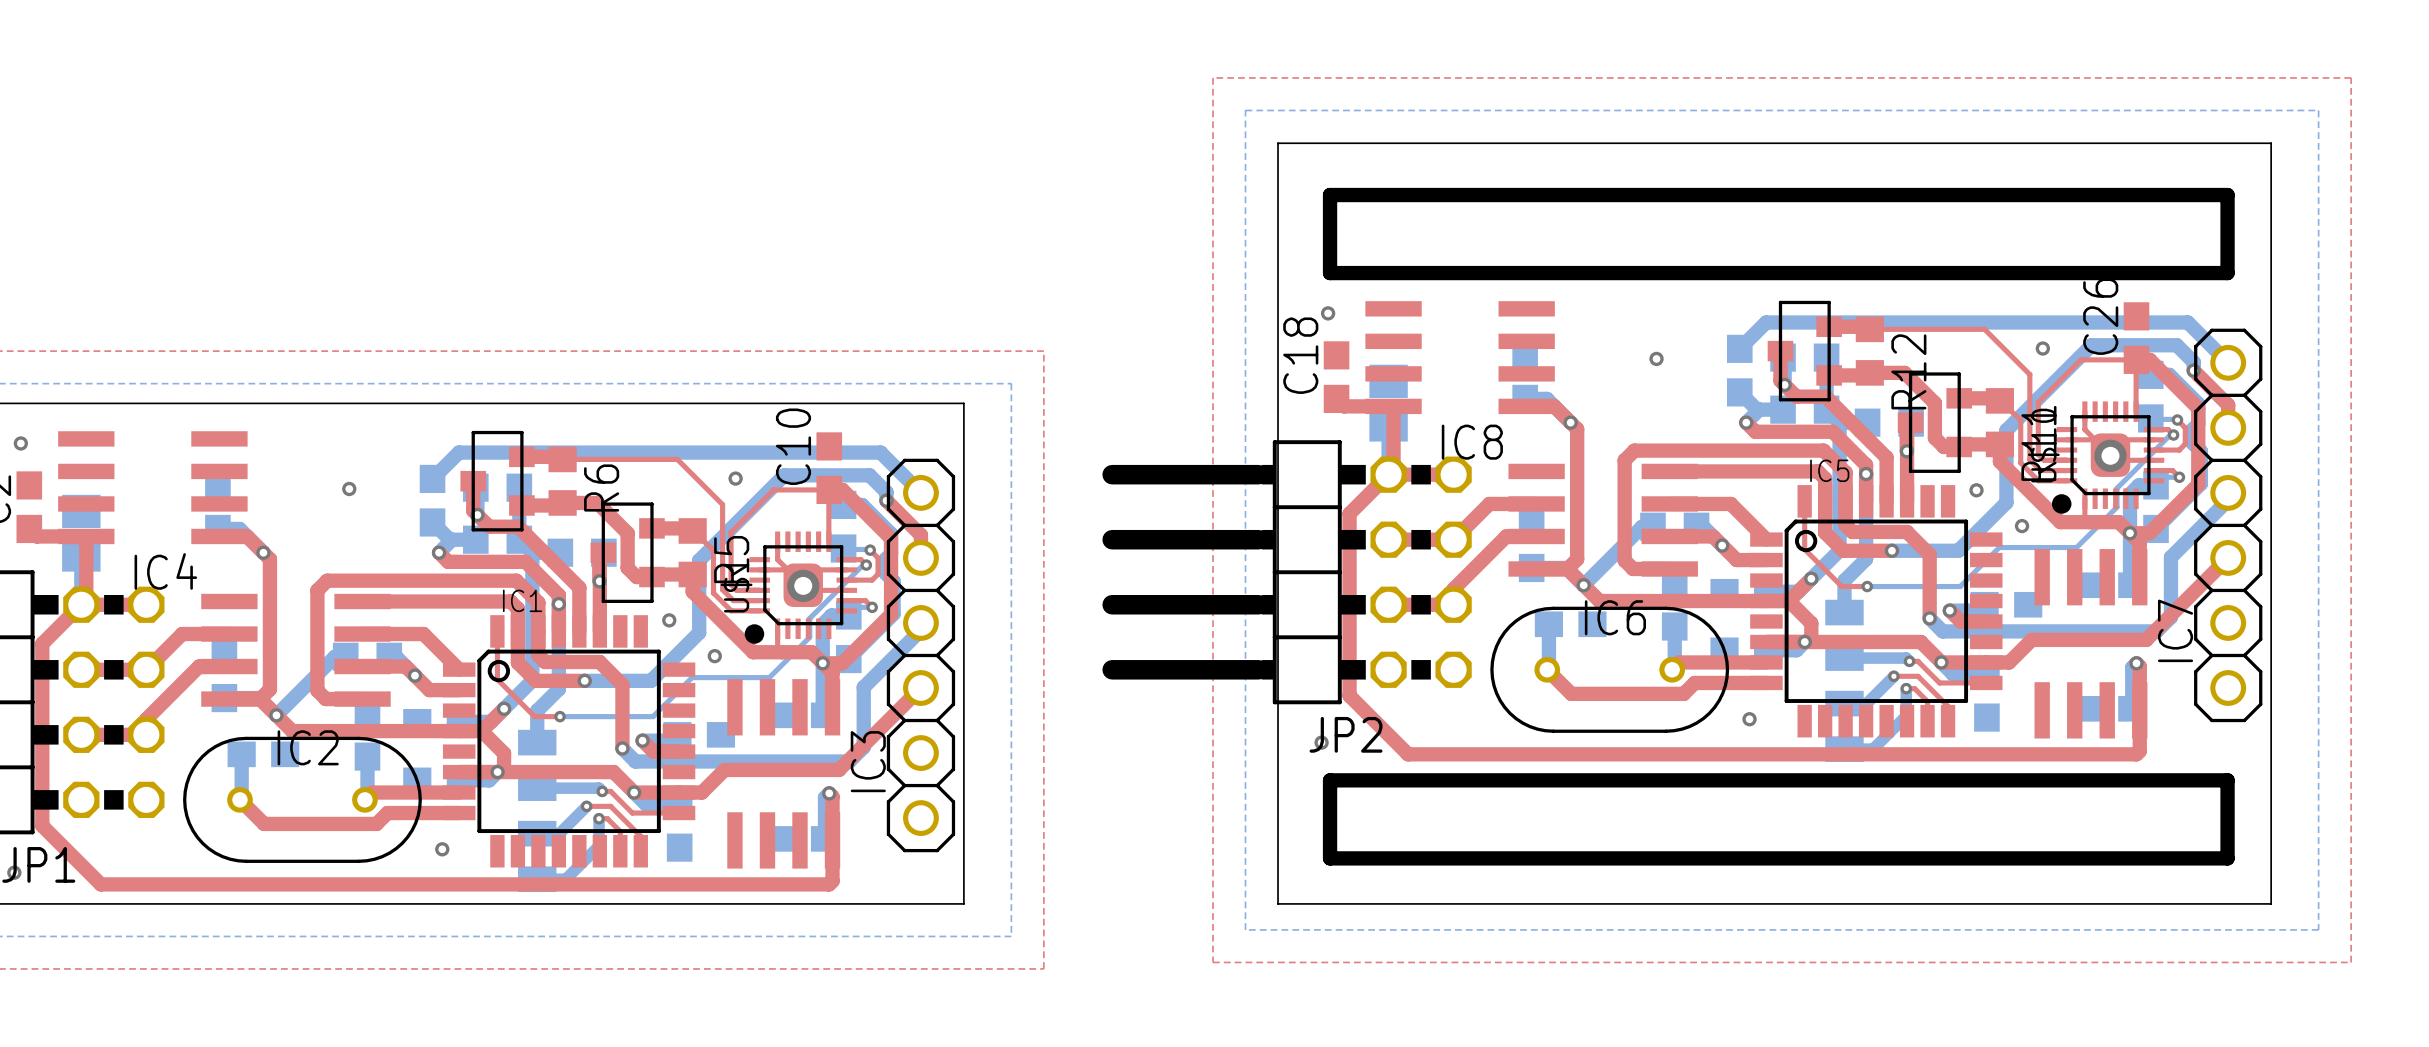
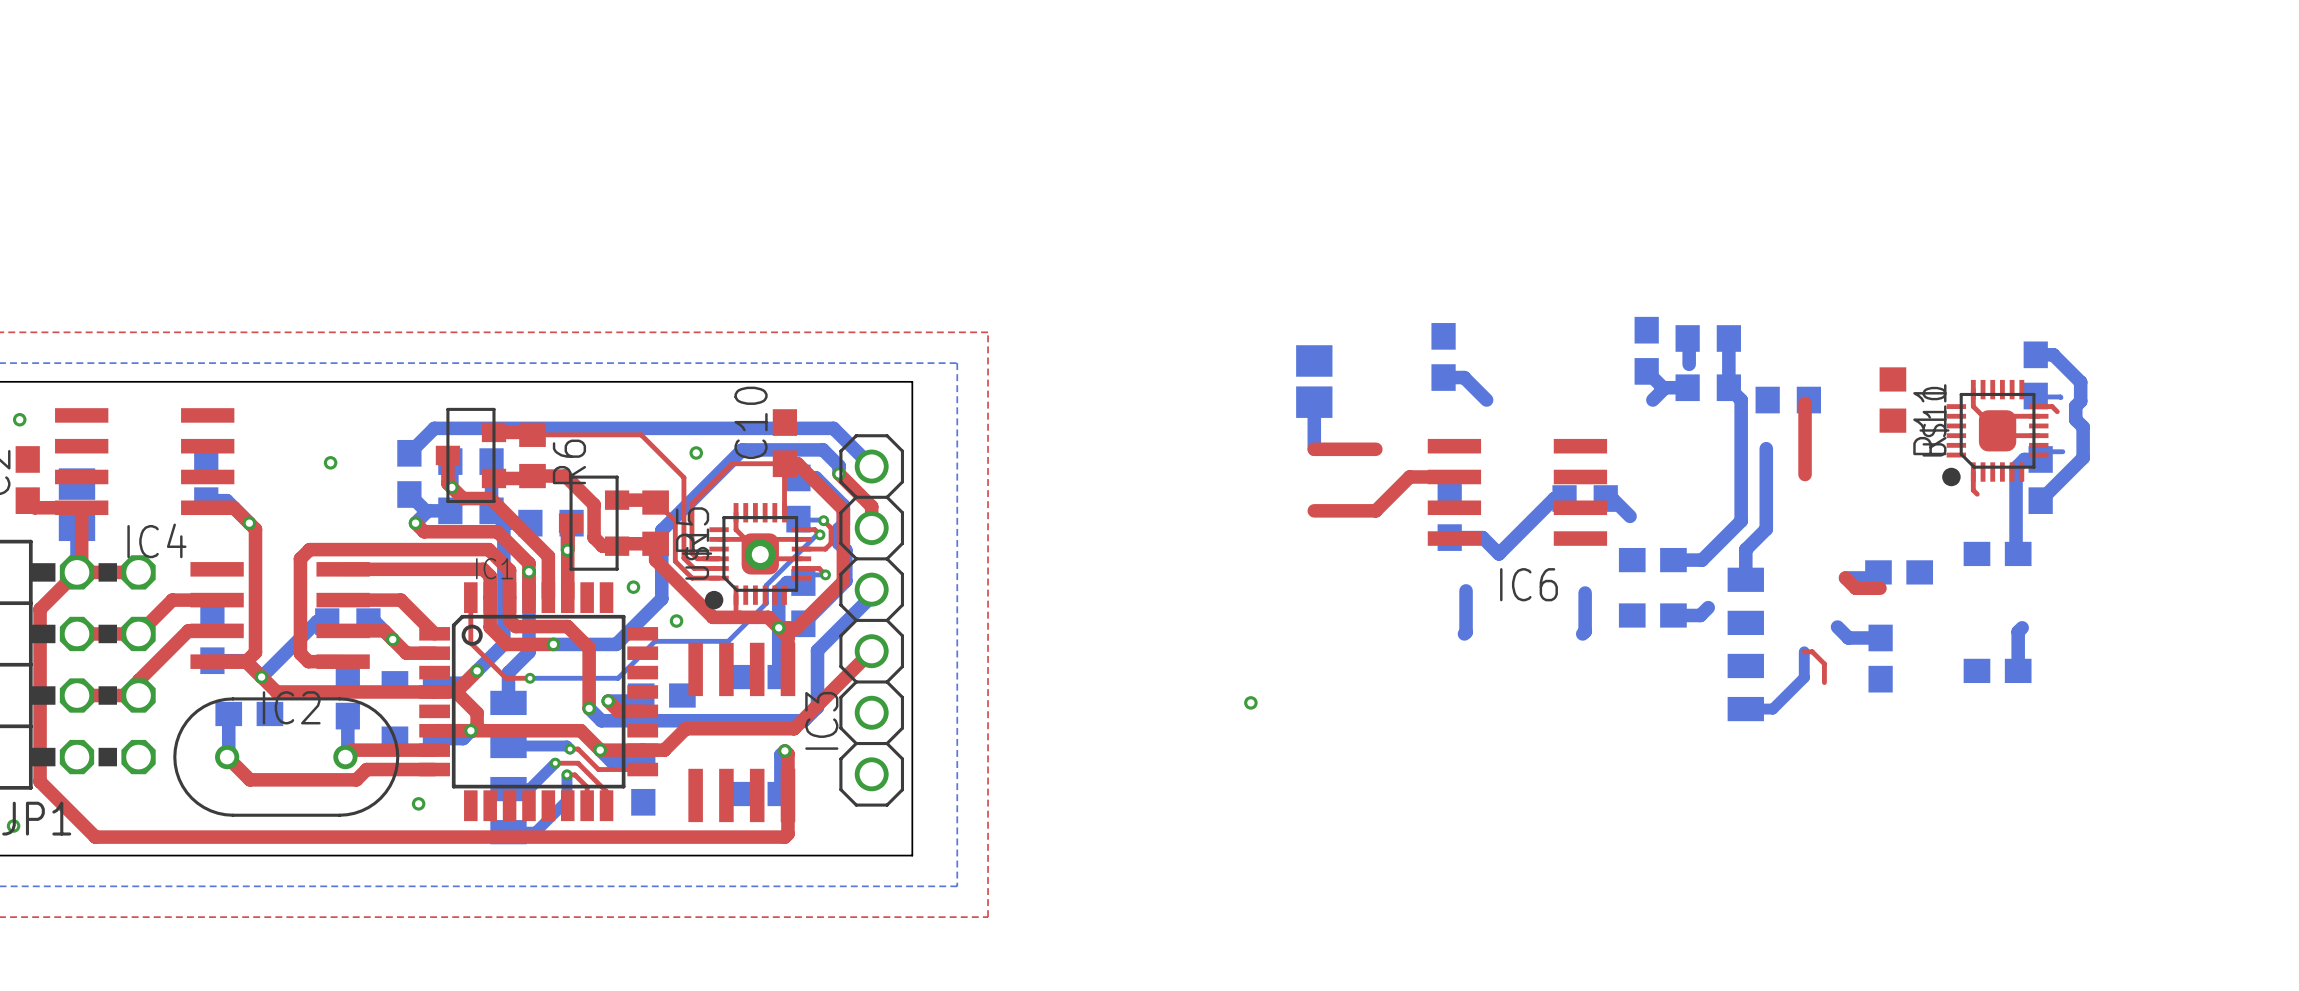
top zone outline: (1212, 77) (1212, 962) (2351, 962) (2351, 77) (1212, 77) -> none
bottom zone outline: (1245, 110) (1245, 929) (2318, 929) (2318, 110) (1245, 110) -> none
board edge: (1278, 143) (2271, 143) (2271, 903) (1278, 903) (1278, 143) -> none
board edge: (1330, 195) (2227, 195) (2227, 273) (1330, 273) (1330, 195) -> none
via: (1328, 313) -> none
top track: (1829, 326) (1867, 326) (1869, 329) (1984, 329) (2029, 374) (2029, 459) (2040, 470) (2066, 470) -> none
C26: (2136, 338) -> none
bottom track: (1739, 348) (1766, 322) (2187, 322) (2228, 362) -> none
via: (2042, 348) -> none
top track: (1780, 351) (1780, 380) (1796, 396) (1825, 396) (1886, 457) (1886, 501) -> none
part: (1804, 351) -> none
R12: (1869, 351) -> none
IC8: (1460, 357) -> none
via: (1656, 358) -> none
top track: (2136, 359) (2149, 359) (2198, 408) (2198, 484) (2149, 533) (2129, 533) -> none
top track: (2136, 359) (2080, 359) (2038, 402) (2038, 454) (2044, 460) (2066, 460) -> none
top track: (2136, 359) (2136, 411) -> none
bottom track: (2193, 370) (2193, 362) (2176, 345) (2091, 345) (2006, 430) (2006, 502) (1958, 550) (1891, 550) -> none
top track: (2193, 370) (2228, 405) (2228, 427) -> none
via: (2193, 370) -> none
top track: (1829, 375) (1904, 372) (1934, 403) (1934, 437) (1943, 446) (1959, 446) (1961, 444) (1999, 444) (1999, 461) (2060, 522) (2118, 522) (2139, 542) (2139, 577) -> none
C18: (1336, 377) -> none
via: (1784, 384) -> none
top track: (1336, 398) (1344, 406) (1393, 406) (1393, 469) (1349, 513) (1349, 695) (1408, 754) (2136, 754) (2139, 751) (2139, 666) (2136, 663) -> none
top track: (1959, 398) (1997, 398) (2020, 420) (2020, 462) (2038, 480) (2066, 480) -> none
top track: (1526, 406) (1554, 406) (1577, 429) (1577, 559) (1567, 568) -> none
top track: (2177, 420) (2185, 427) (2185, 444) (2179, 450) (2154, 450) -> none
via: (2177, 420) -> none
via: (1570, 422) -> none
top track: (1746, 422) (1755, 431) (1832, 431) (1866, 465) (1866, 501) -> none
via: (1746, 422) -> none
part: (1934, 422) -> none
bottom track: (2173, 435) (2170, 435) (2116, 488) (2116, 507) (2076, 547) (1999, 547) (1960, 586) (1867, 586) -> none
via: (2173, 435) -> none
top track: (2066, 439) (2095, 439) -> none
via: (1906, 451) -> none
via: (2110, 455) -> none
top track: (2154, 470) (2172, 470) (2179, 477) -> none
top track: (1669, 471) (1817, 471) (1825, 478) (1825, 532) (1843, 550) (1891, 550) -> none
via: (1866, 474) -> none
via: (2179, 477) -> none
via: (1976, 490) -> none
bottom track: (2228, 492) (2228, 500) (2170, 557) (2170, 617) (2156, 631) (1942, 631) (1929, 618) -> none
top track: (1804, 501) (1804, 549) (1841, 586) (1867, 586) -> none
top track: (1669, 503) (1730, 503) (1766, 539) -> none
part: (2228, 525) -> none
via: (2022, 526) -> none
via: (2129, 533) -> none
top track: (1536, 536) (1506, 536) (1453, 589) (1453, 604) (1388, 604) -> none
top track: (1669, 536) (1713, 536) (1736, 560) (1766, 560) -> none
via: (1722, 545) -> none
via: (1891, 550) -> none
top track: (2228, 557) (2146, 639) (2031, 639) (2009, 662) (1941, 662) (1920, 641) (1766, 641) -> none
top track: (1567, 568) (1599, 601) (1789, 601) -> none
top track: (1669, 568) (1633, 568) (1624, 560) (1624, 460) (1634, 450) (1823, 450) (1845, 472) (1845, 525) (1852, 531) (1906, 531) (1929, 554) (1929, 618) -> none
JP2: (1287, 572) -> none
top track: (1811, 578) (1789, 601) -> none
via: (1811, 578) -> none
via: (1583, 585) -> none
via: (1867, 586) -> none
top track: (1789, 601) (1811, 623) (1811, 637) (1806, 641) -> none
part: (1674, 604) -> none
via: (1949, 610) -> none
IC5: (1876, 611) -> none
via: (1929, 618) -> none
part: (1570, 624) -> none
via: (1804, 641) -> none
IC7: (2090, 643) -> none
bottom track: (1844, 658) (1906, 658) (1909, 661) -> none
top track: (1909, 661) (1917, 661) (1939, 682) (1986, 682) -> none
via: (1909, 661) -> none
top track: (1766, 662) (1679, 662) (1672, 669) -> none
via: (1941, 662) -> none
via: (2136, 663) -> none
top track: (1547, 669) (1571, 693) (1683, 693) (1694, 682) (1766, 682) -> none
part: (1609, 669) -> none
bottom track: (1893, 676) (1866, 703) (1844, 703) -> none
top track: (1893, 676) (1917, 676) (1948, 706) (1948, 721) -> none
via: (1893, 676) -> none
via: (1906, 688) -> none
via: (1749, 719) -> none
board edge: (1330, 780) (1330, 858) (2227, 858) (2227, 780) (1330, 780) -> none

